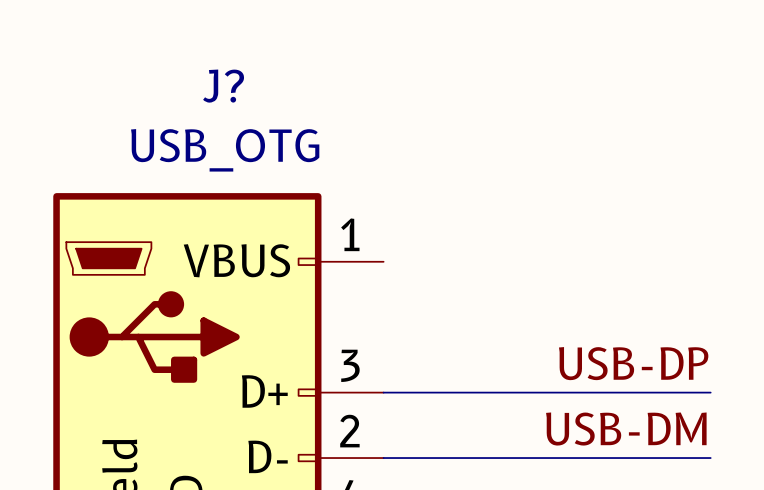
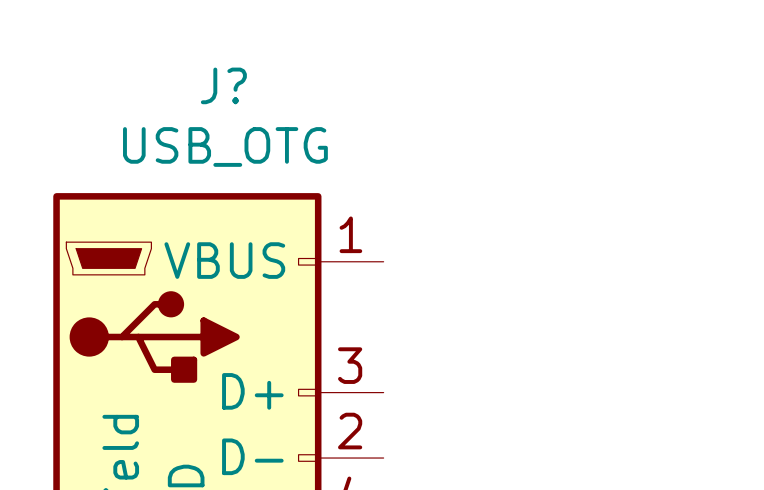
label: USB-DP (633, 363) -> none
wire: (383, 392) (710, 392) -> none
label: USB-DM (626, 429) -> none
wire: (383, 458) (710, 458) -> none

